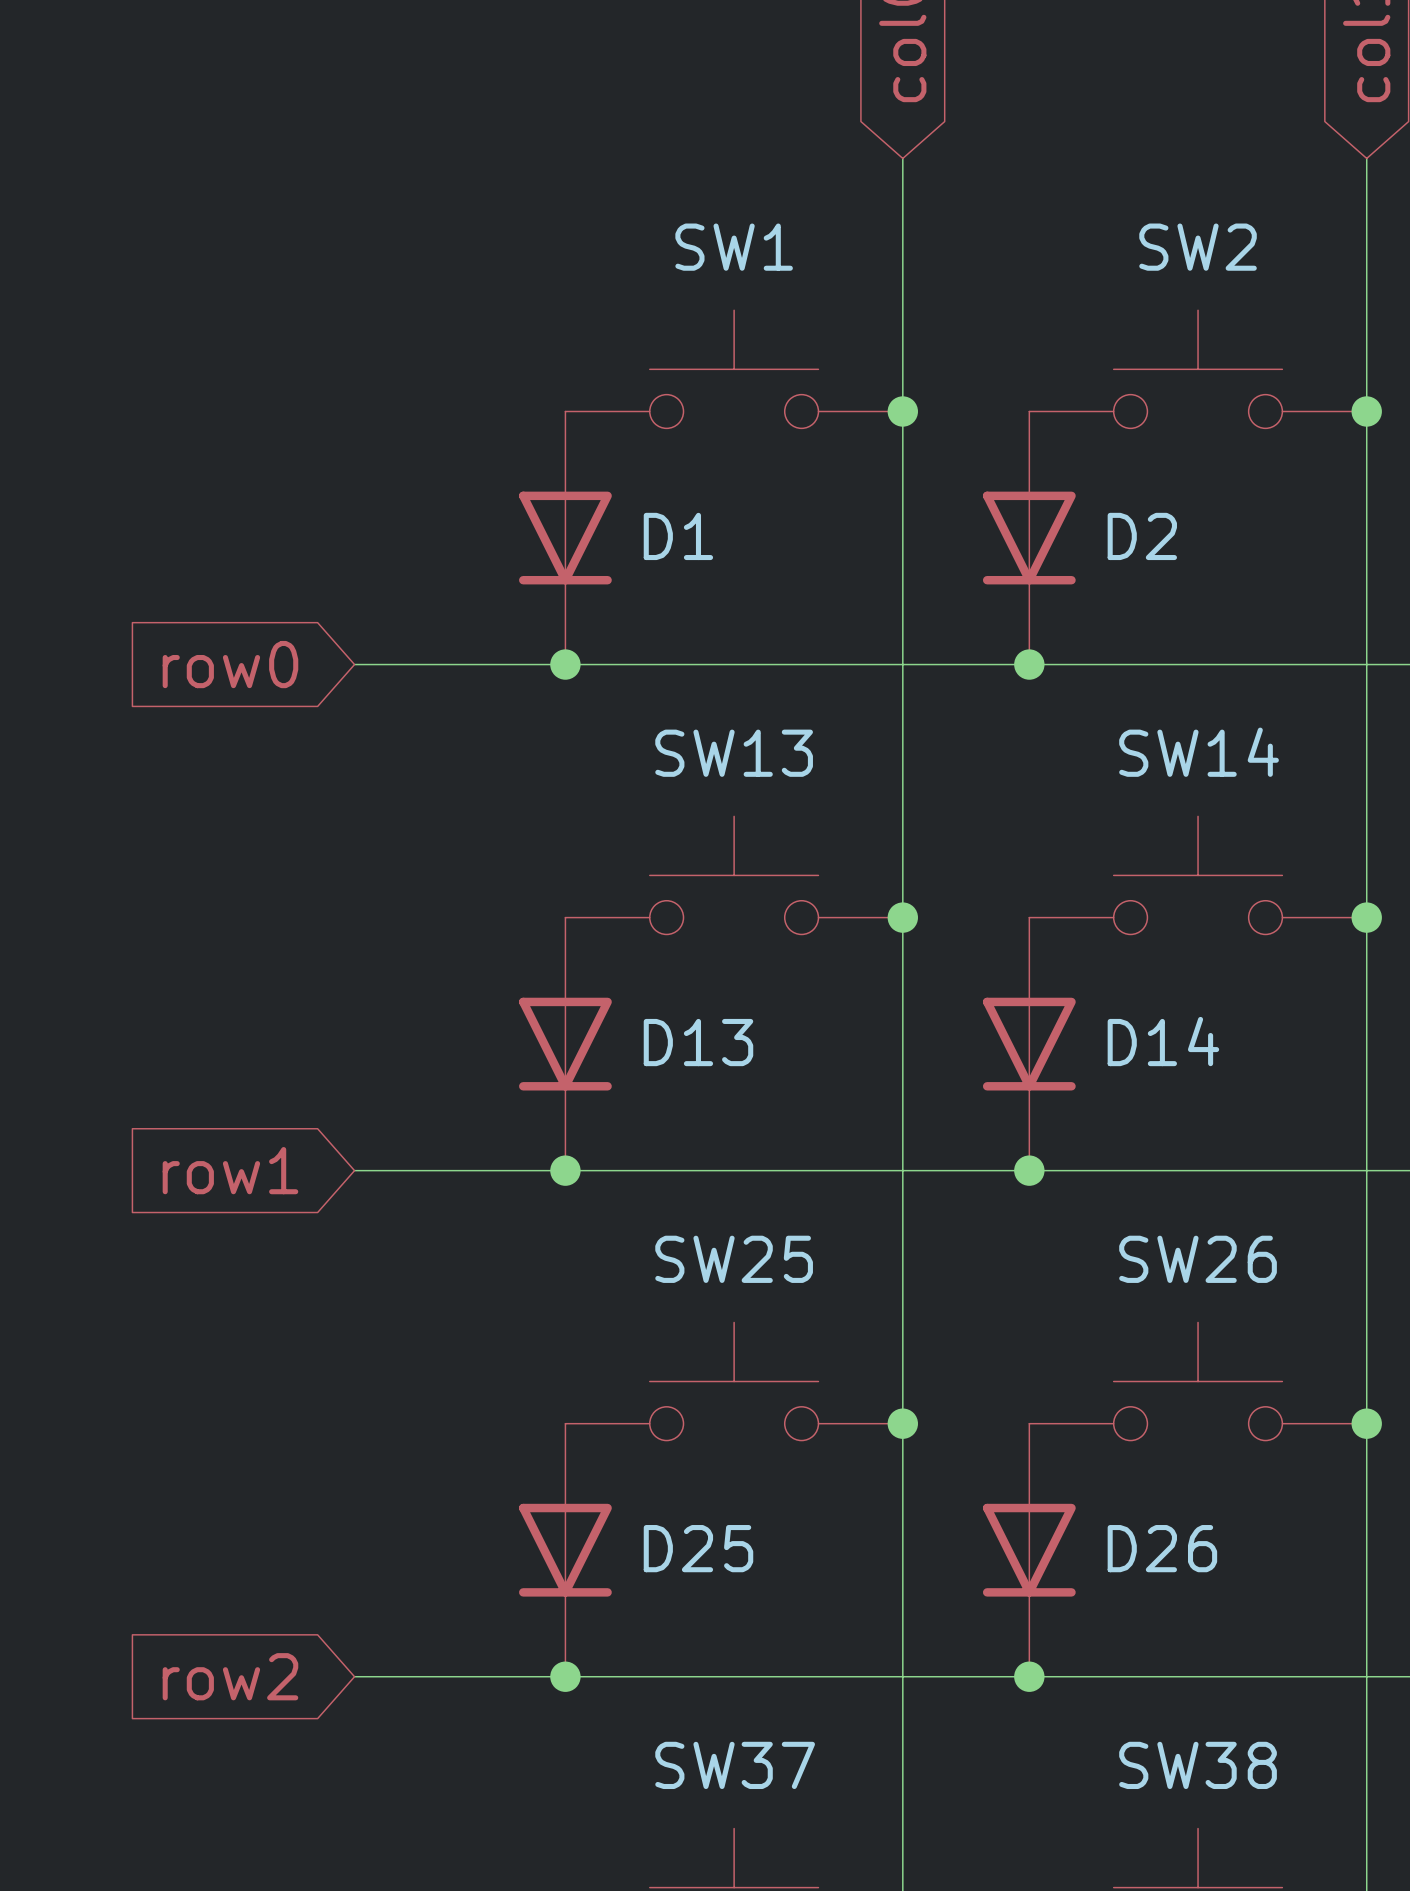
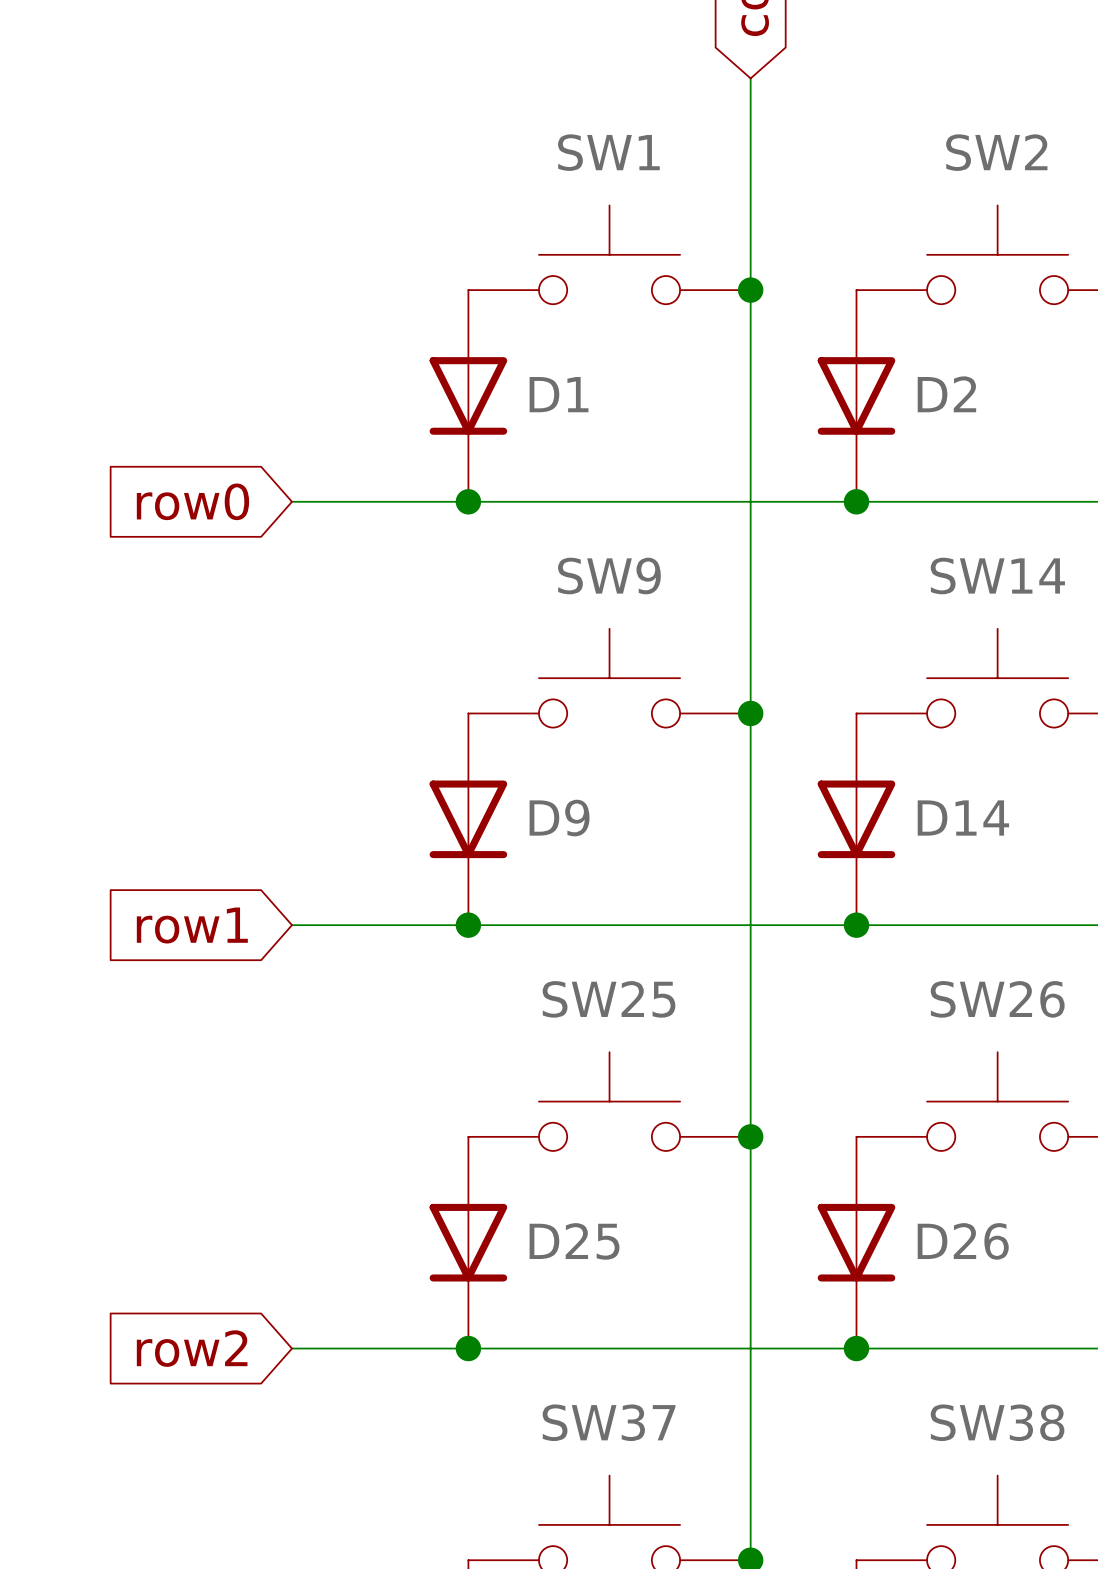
SW13 name: SW13 (734, 753) -> SW9 (609, 576)
D13 name: D13 (698, 1042) -> D9 (559, 818)

